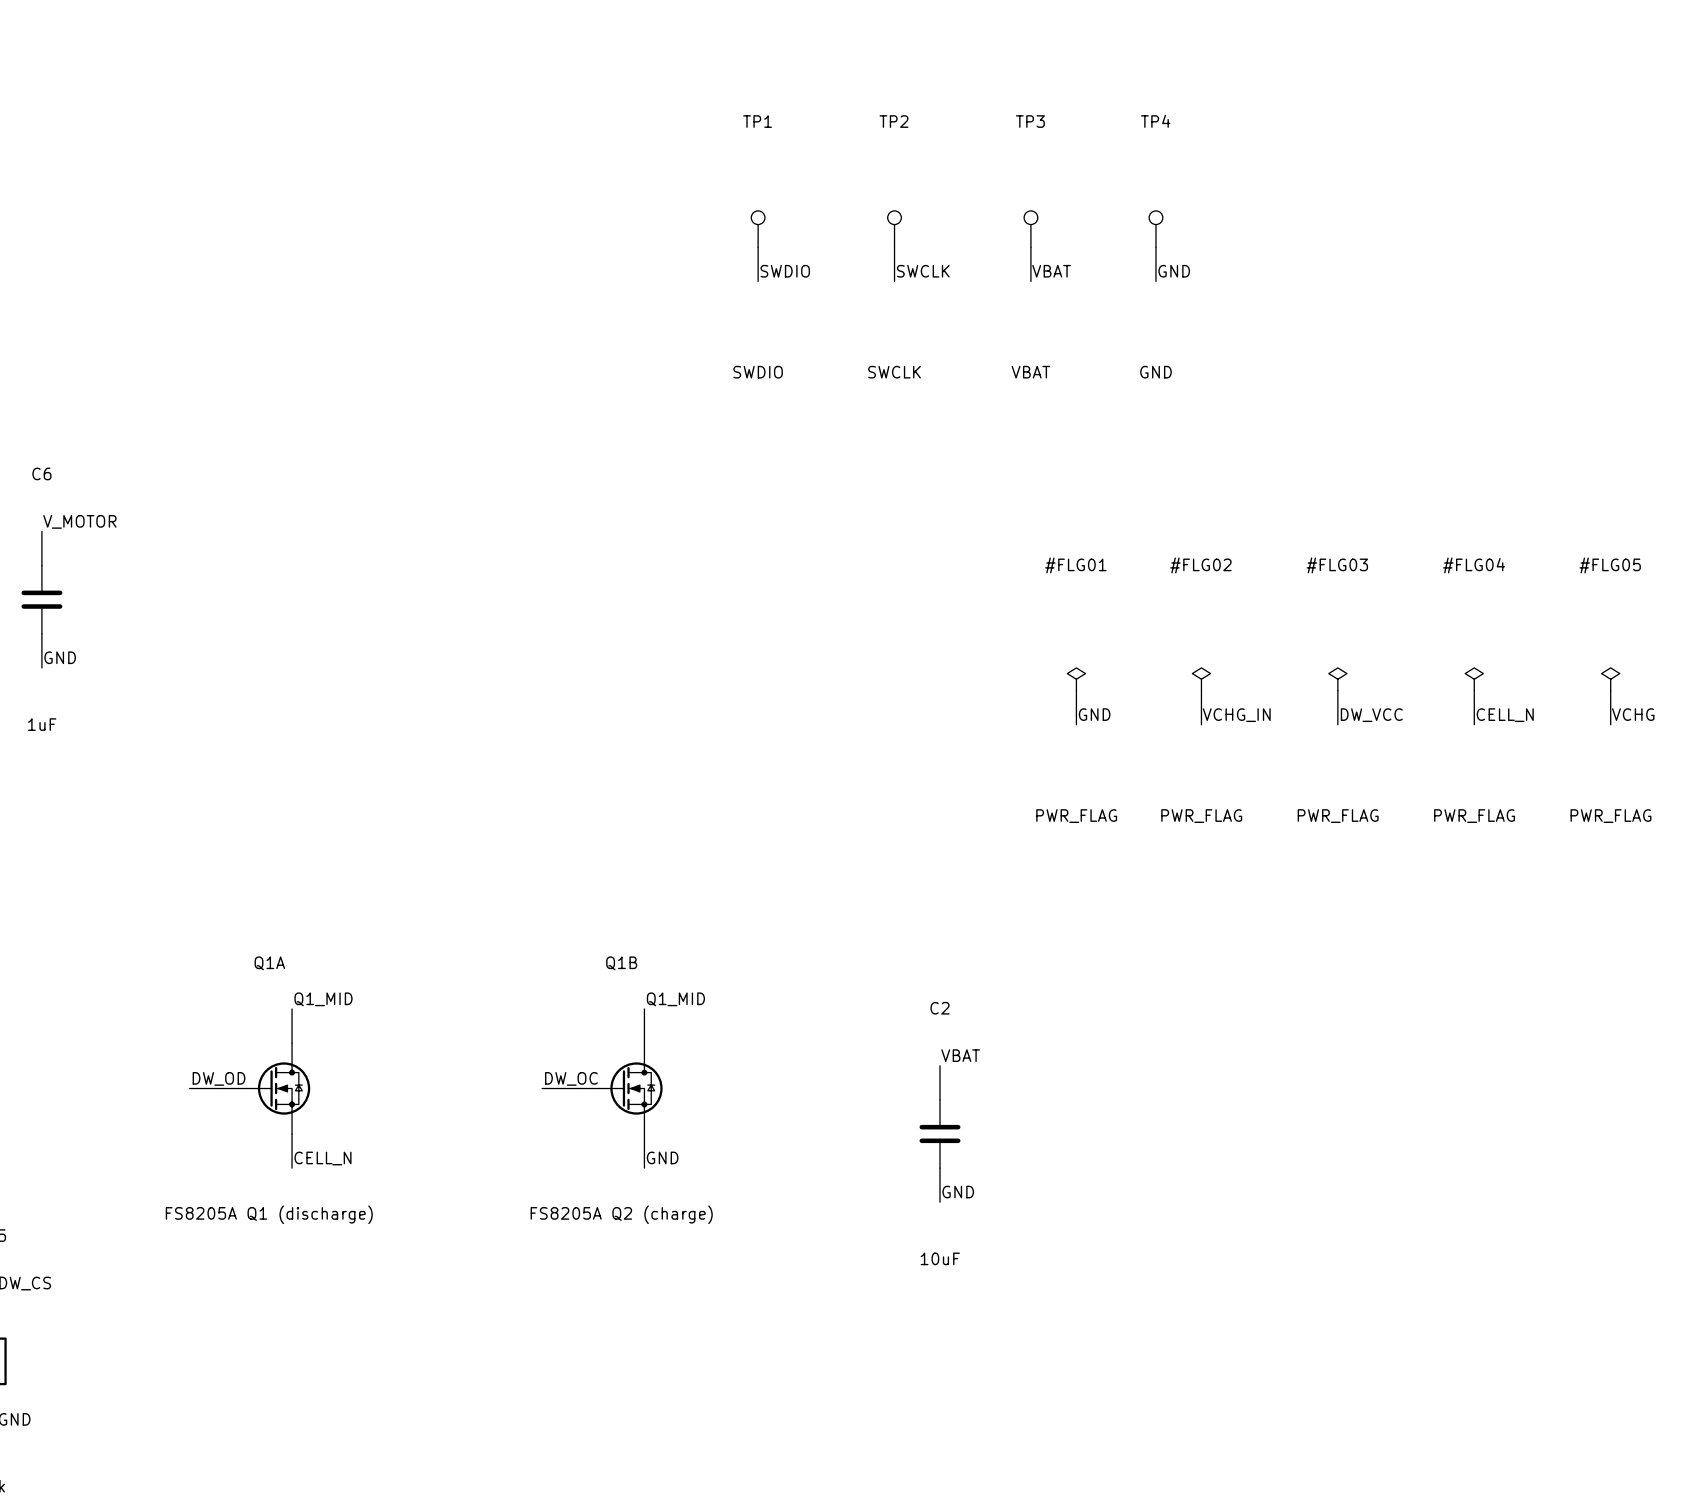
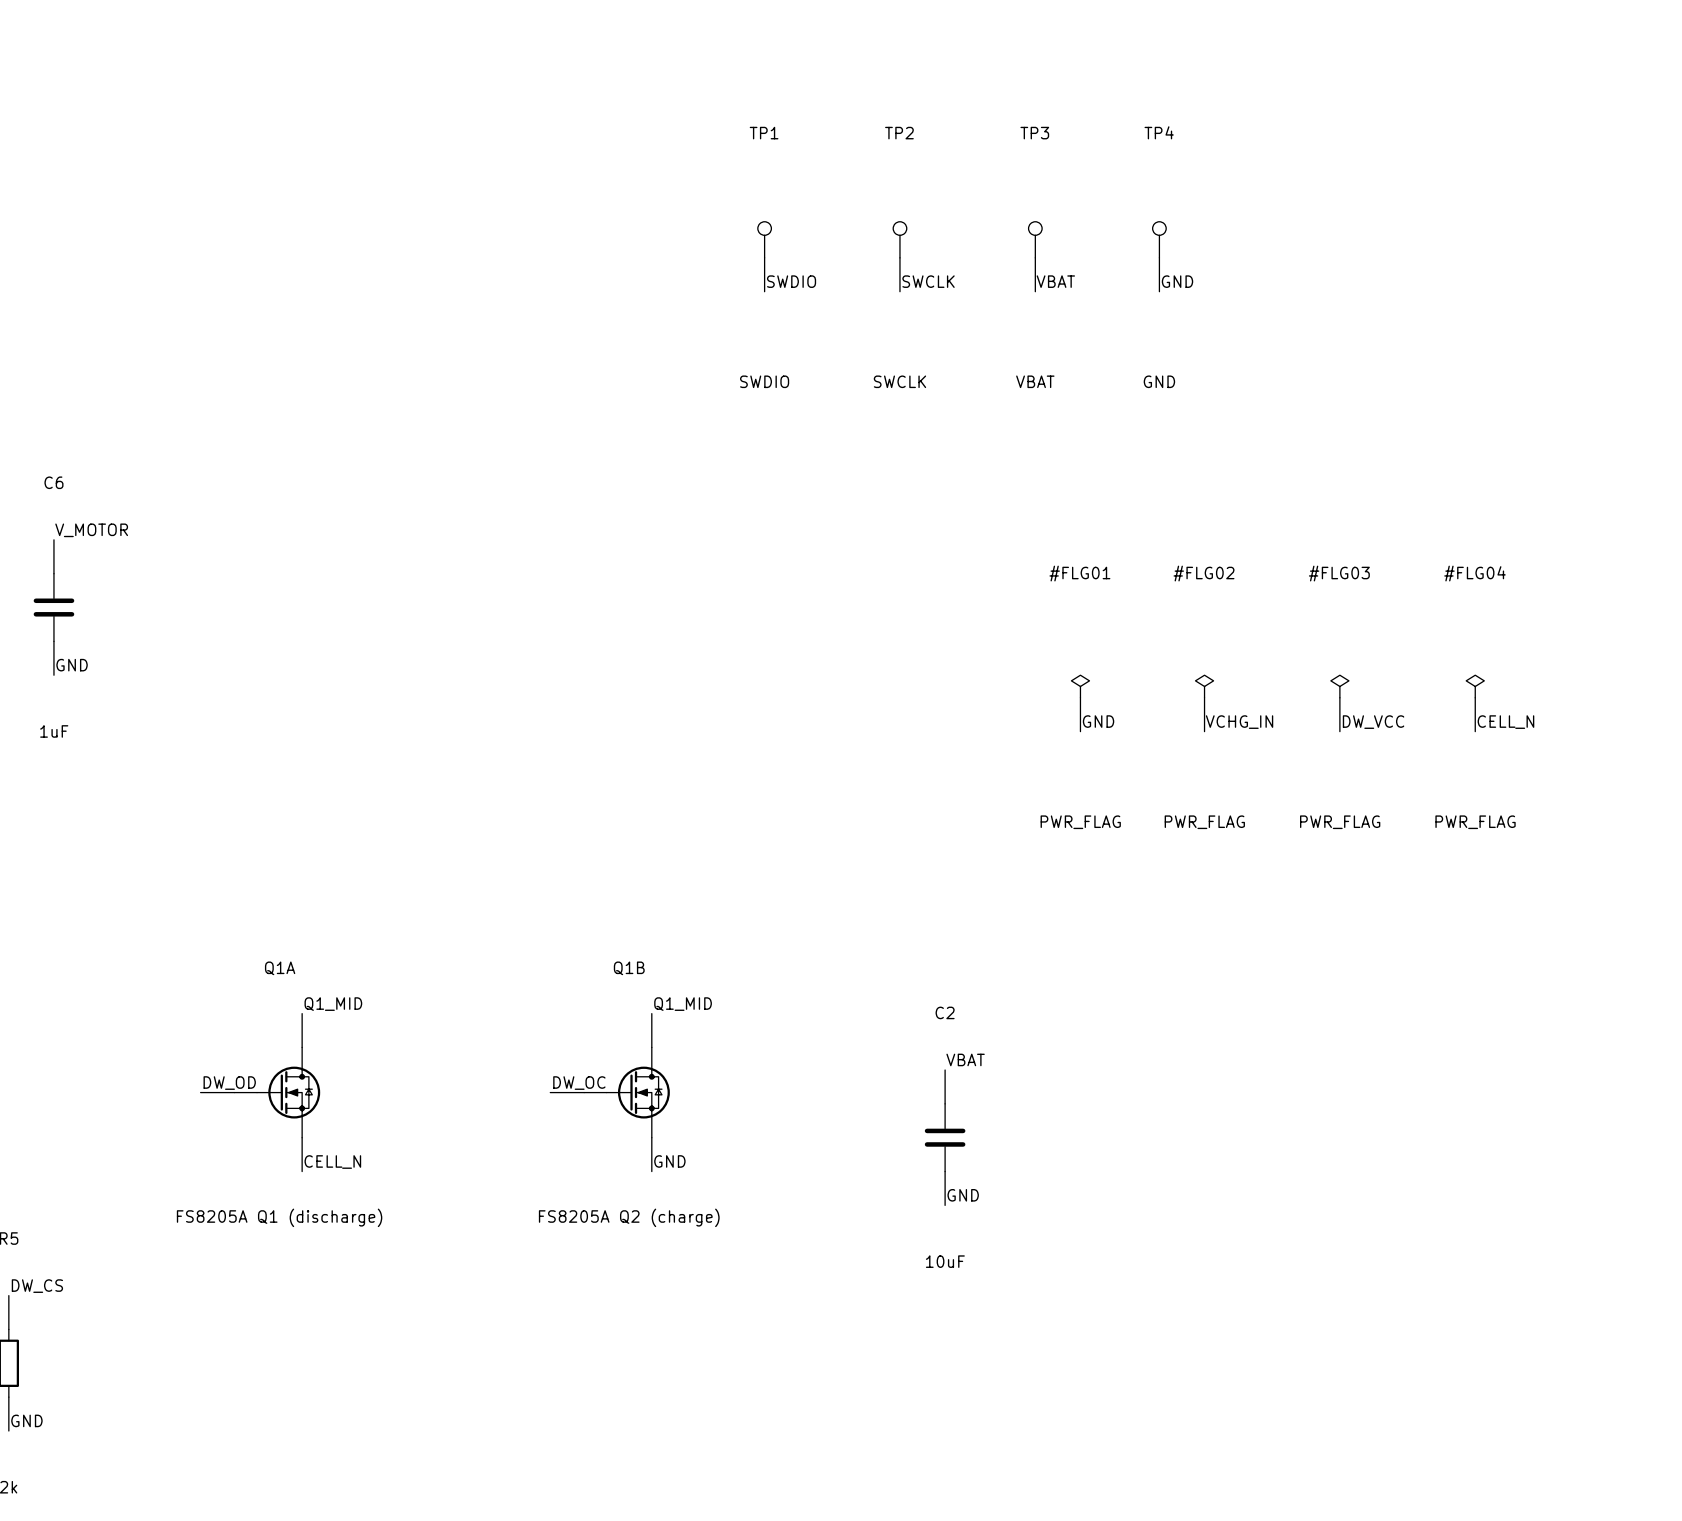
#FLG05: PWR_FLAG (1610, 679) -> none
wire: (1610, 690) (1610, 724) -> none
label: VCHG (1633, 714) -> none

